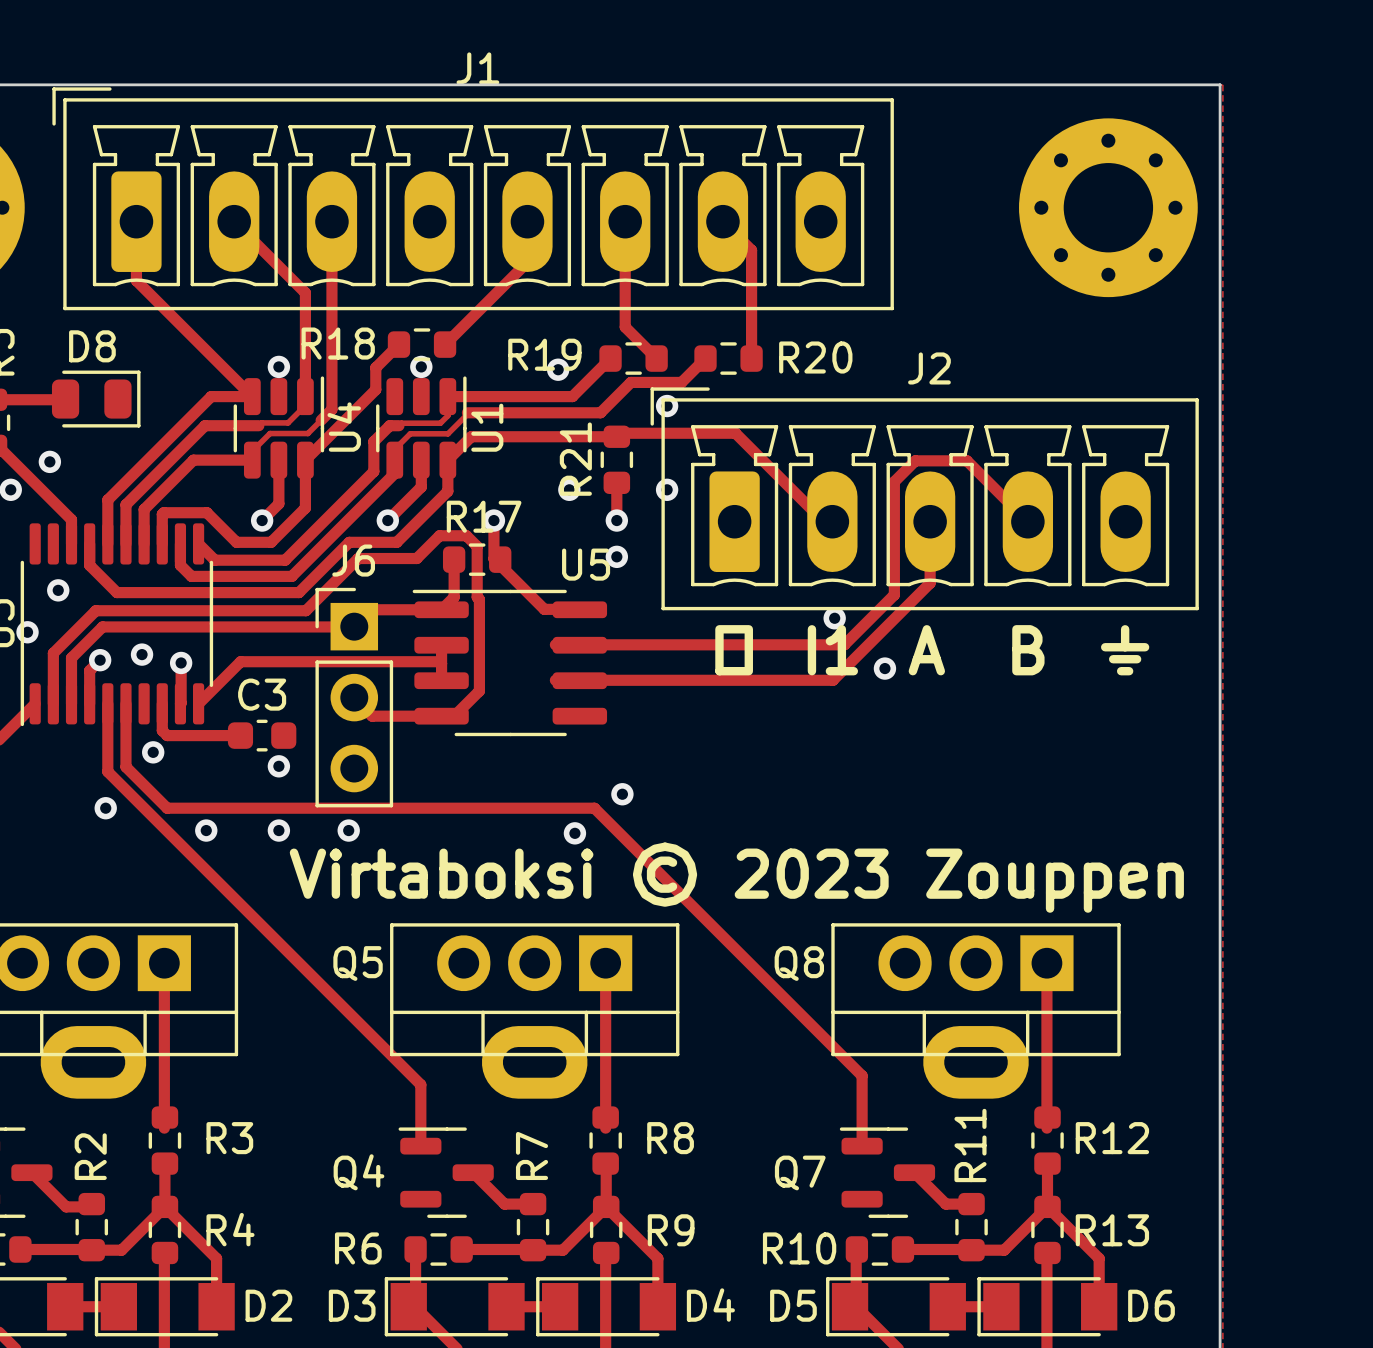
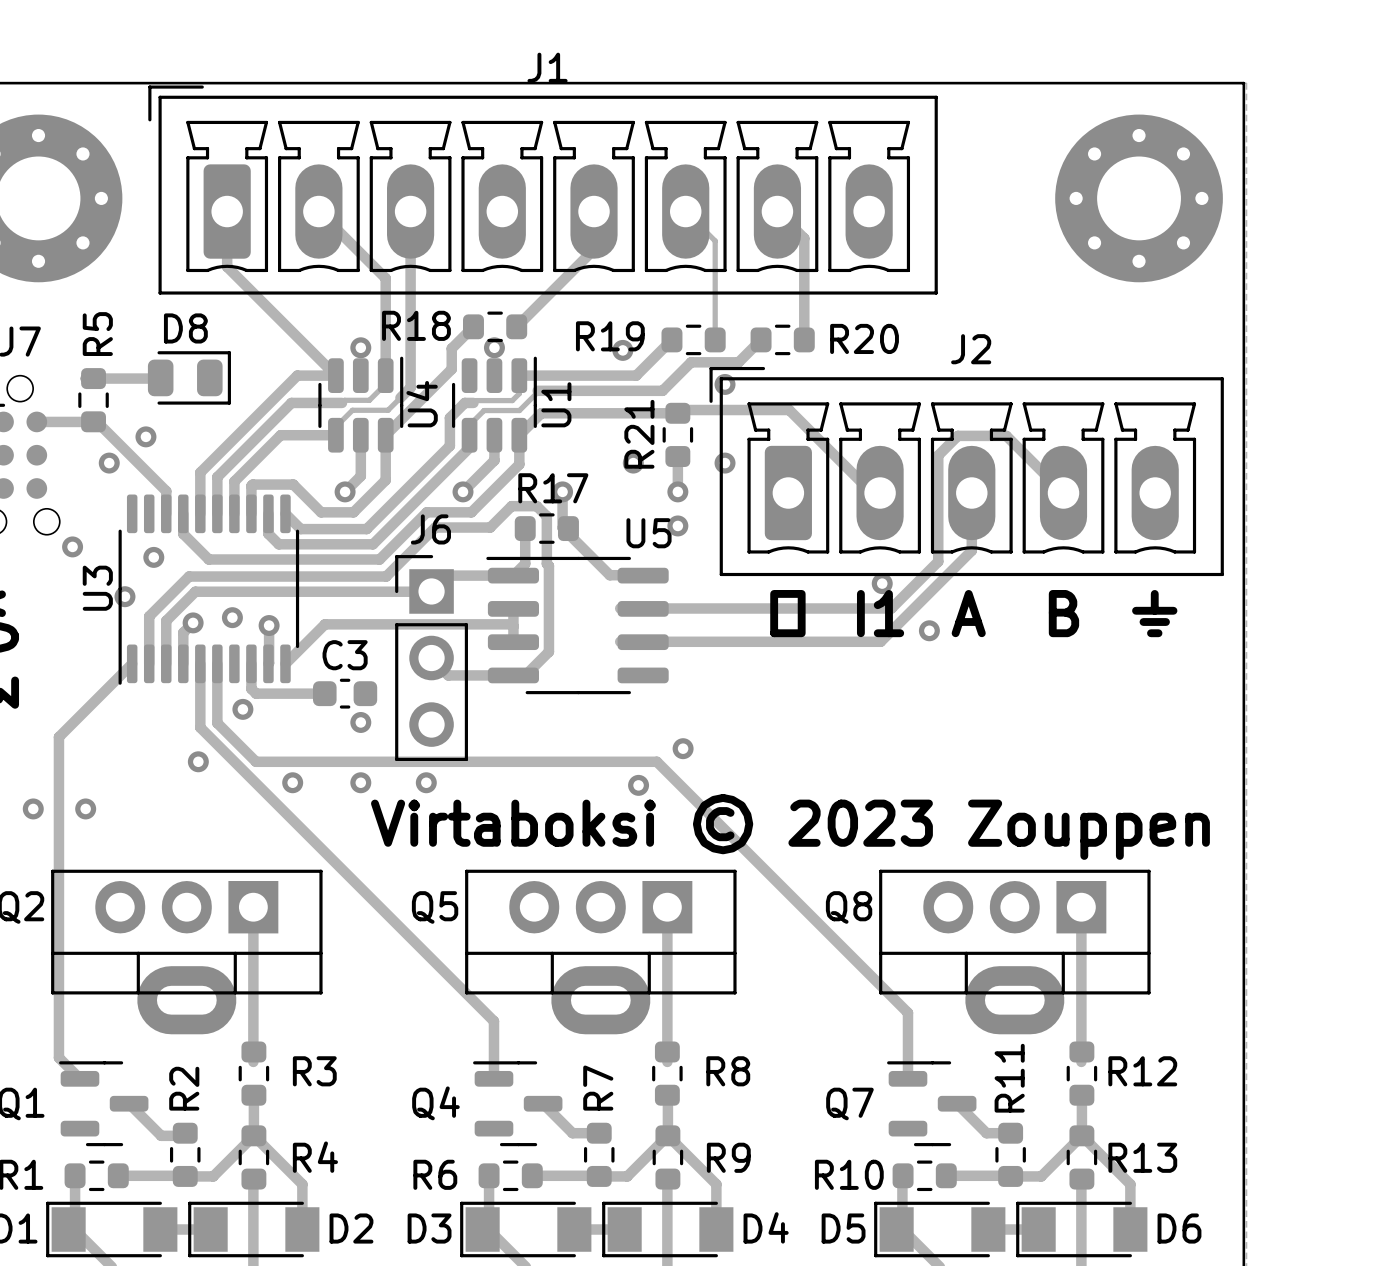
track: (625, 221) (625, 327) (656, 358) -> (685, 211) (715, 241) (715, 339)

